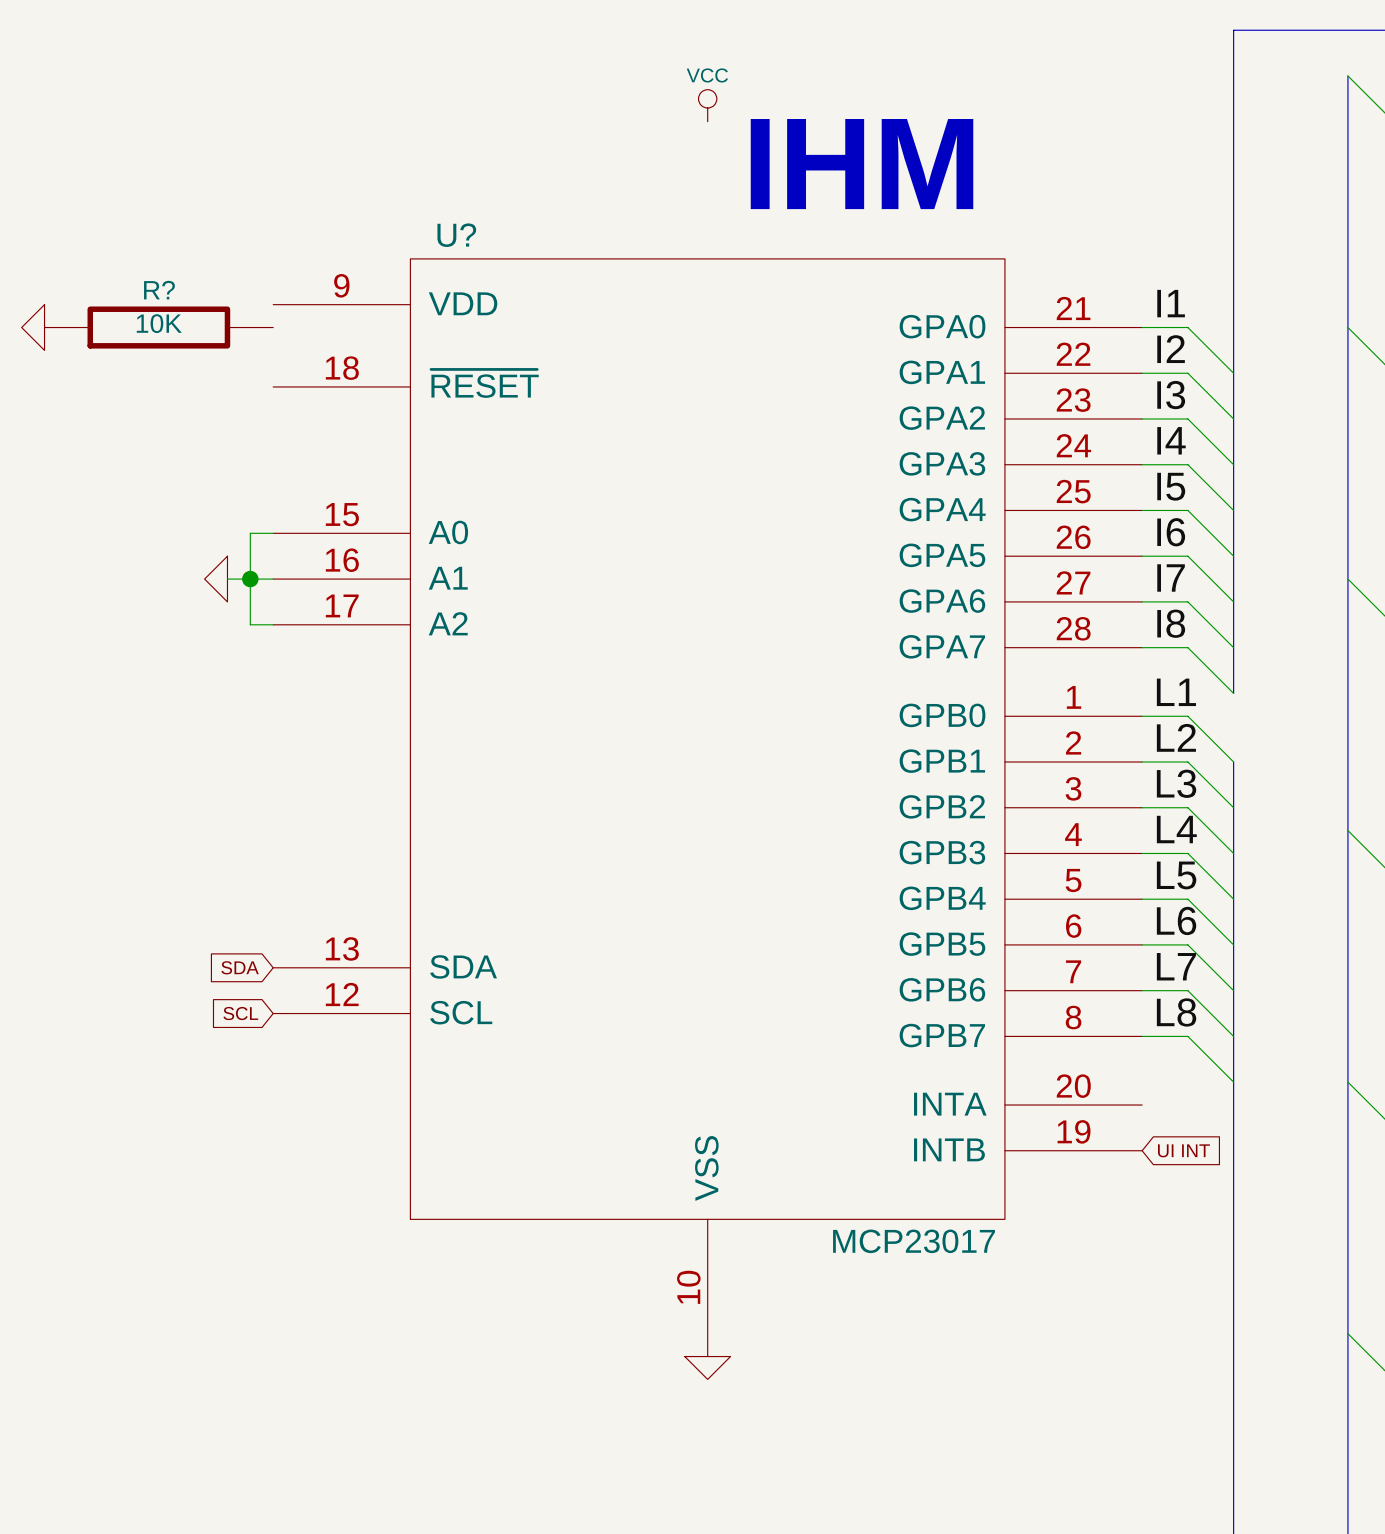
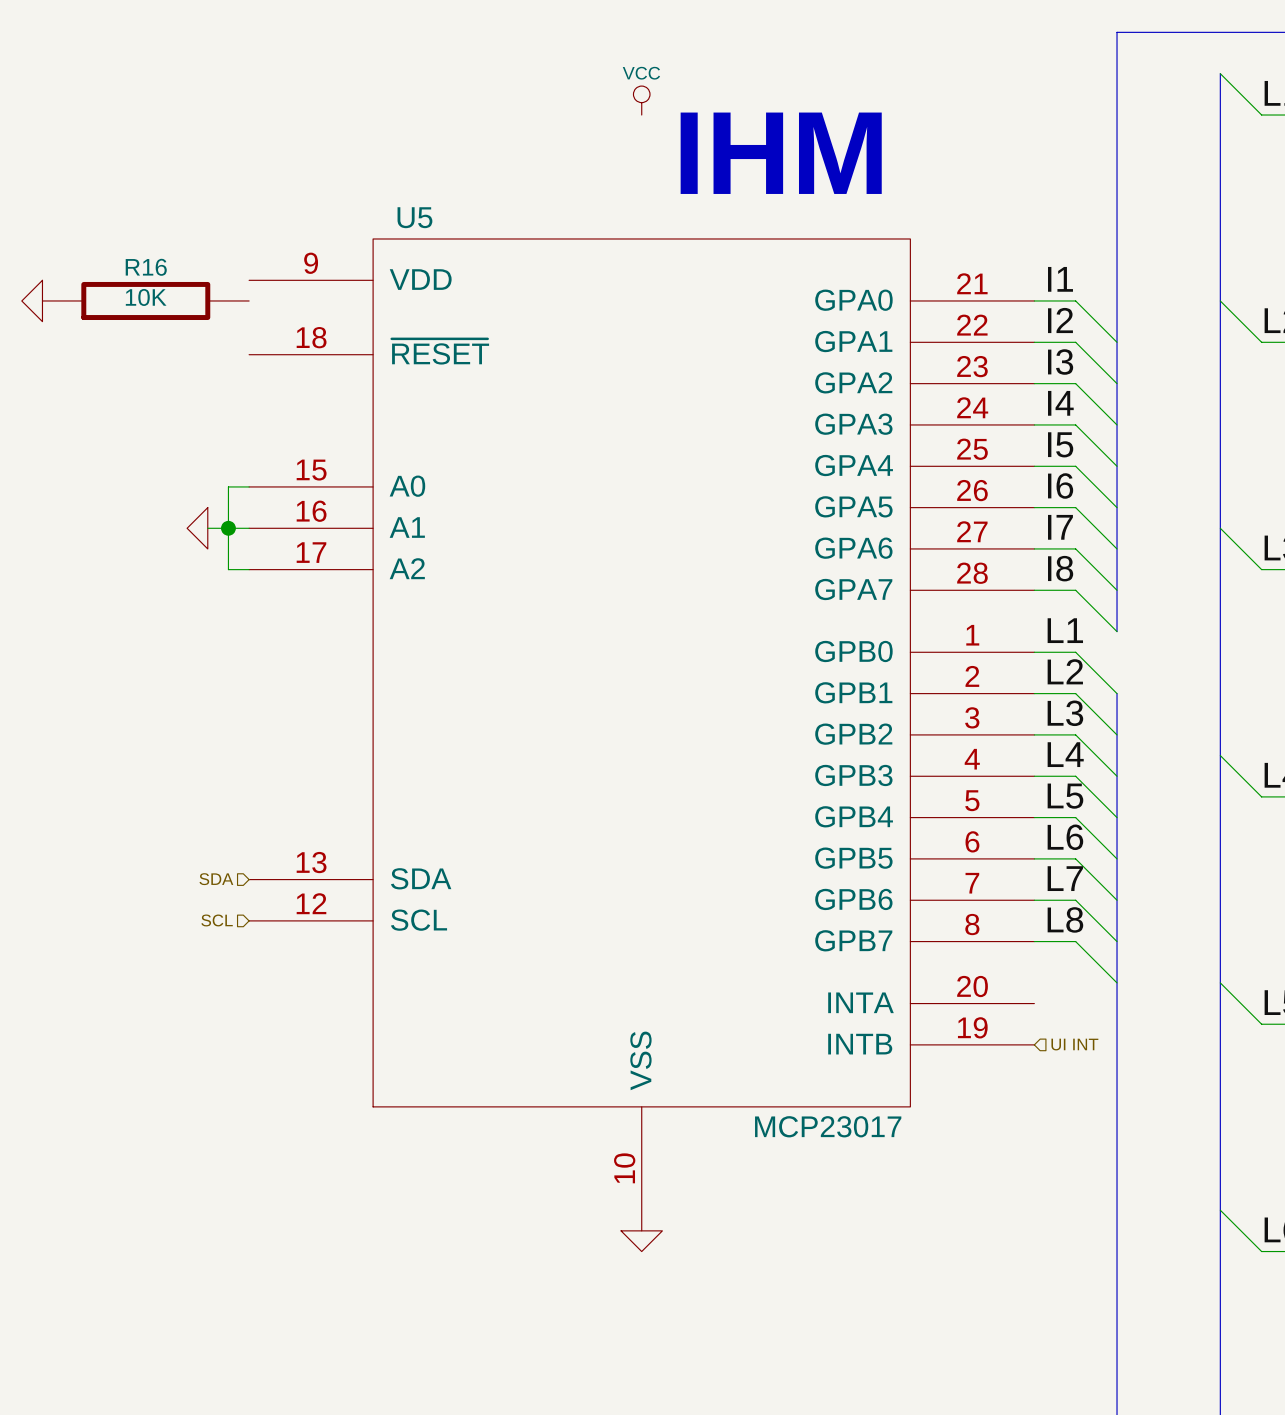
U? name: U? (456, 235) -> U5 (414, 217)
R? name: R? (159, 290) -> R16 (146, 267)
hierarchical label: none -> SDA (216, 879)
global label: SDA (240, 967) -> none
hierarchical label: none -> SCL (217, 920)
global label: SCL (240, 1013) -> none
global label: UI INT (1183, 1150) -> none
hierarchical label: none -> UI INT (1074, 1044)

